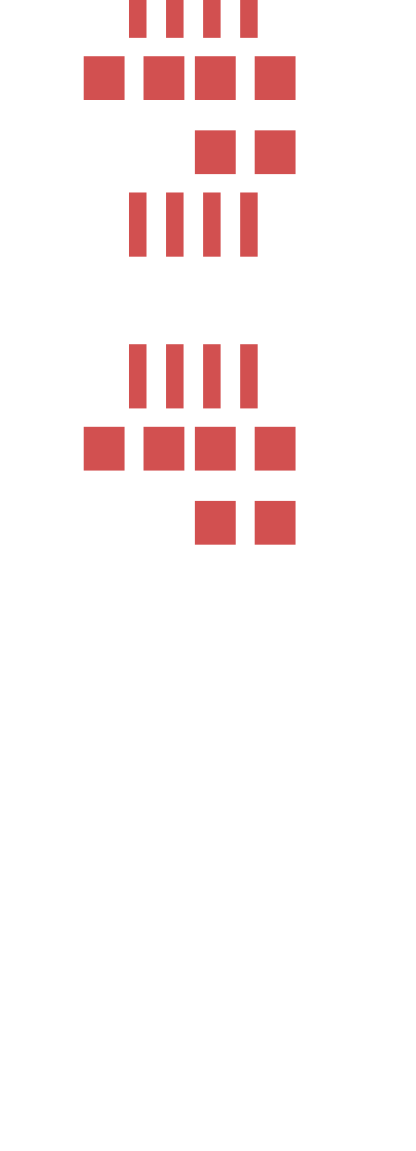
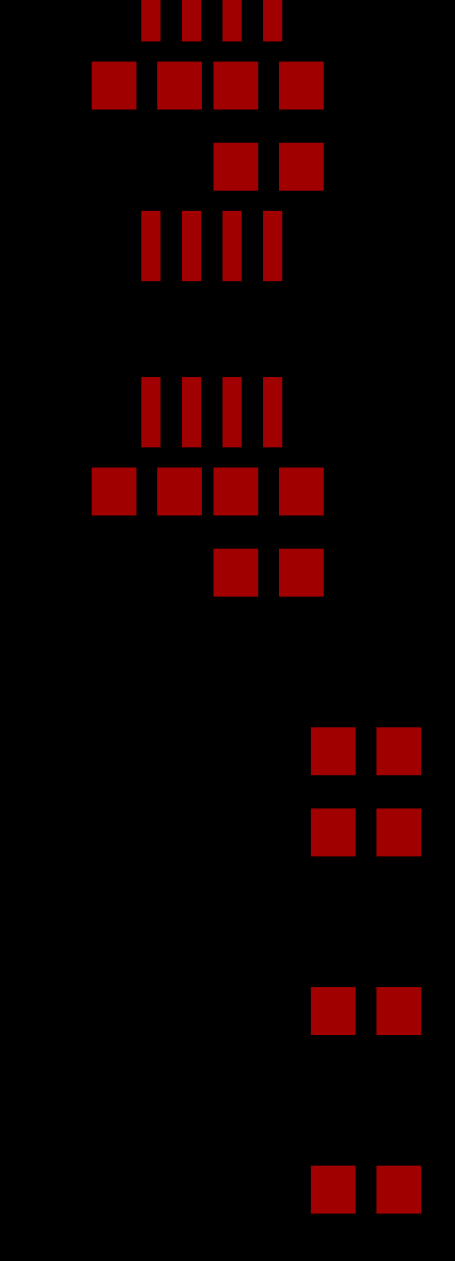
part: none -> (366, 751)
part: none -> (366, 832)
part: none -> (366, 1011)
part: none -> (366, 1189)

